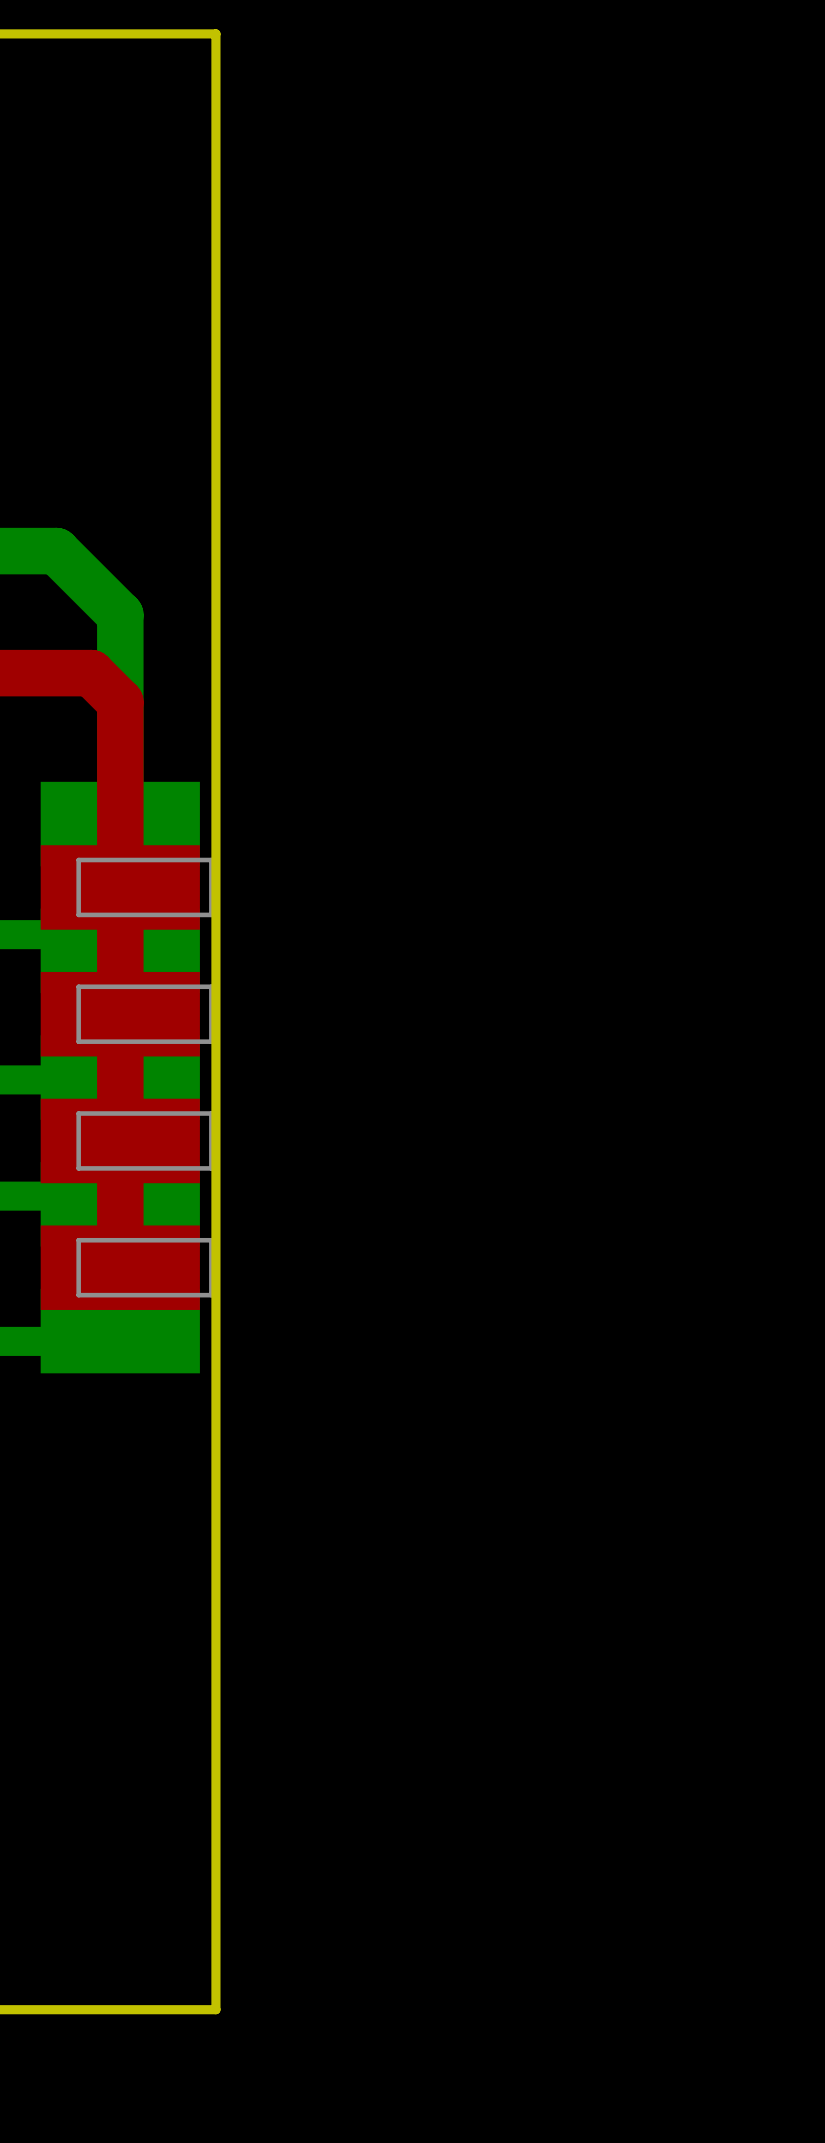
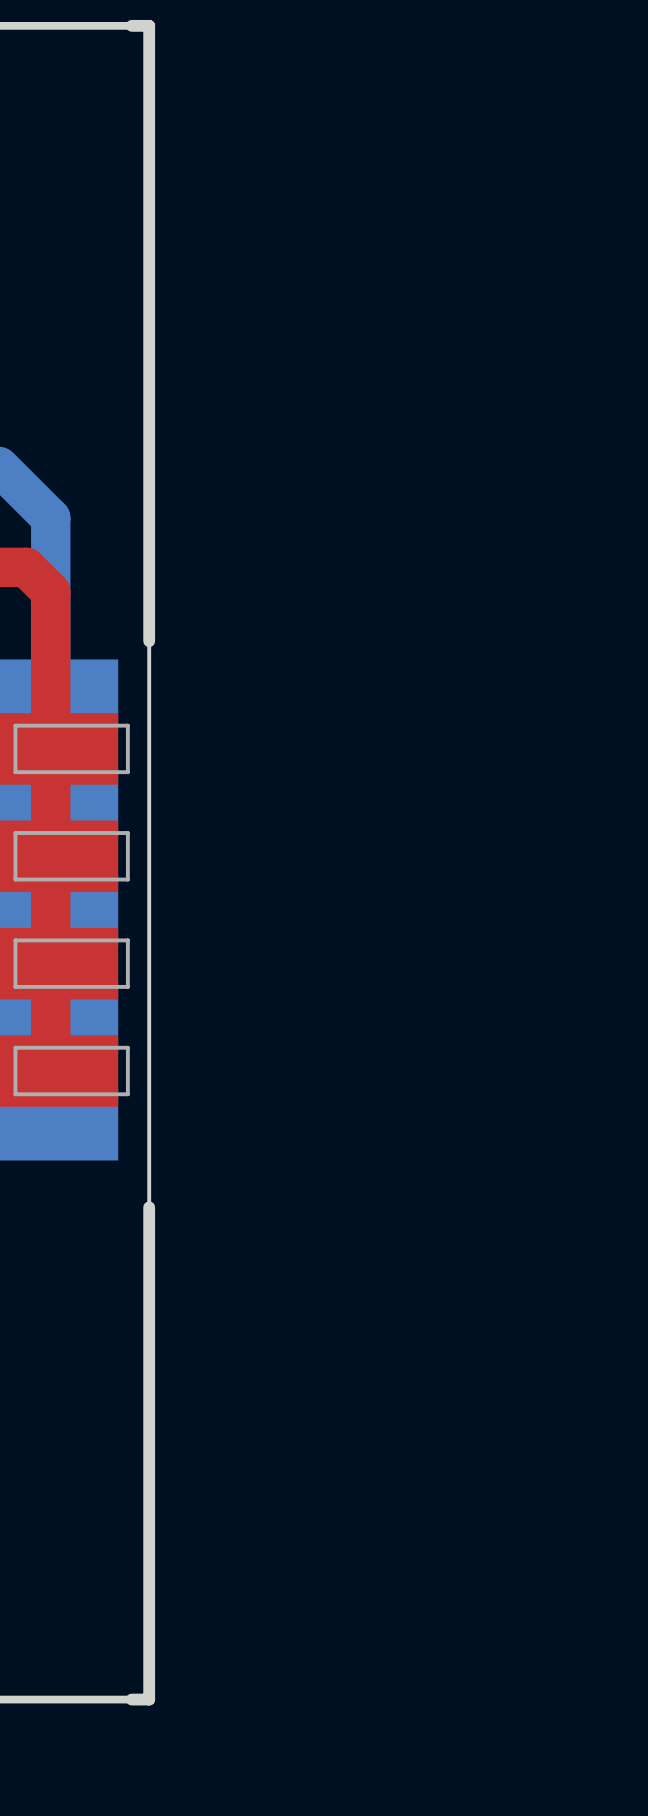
board edge: (215, 33) (215, 2009) -> (131, 25) (149, 25) (149, 1699) (131, 1699)

